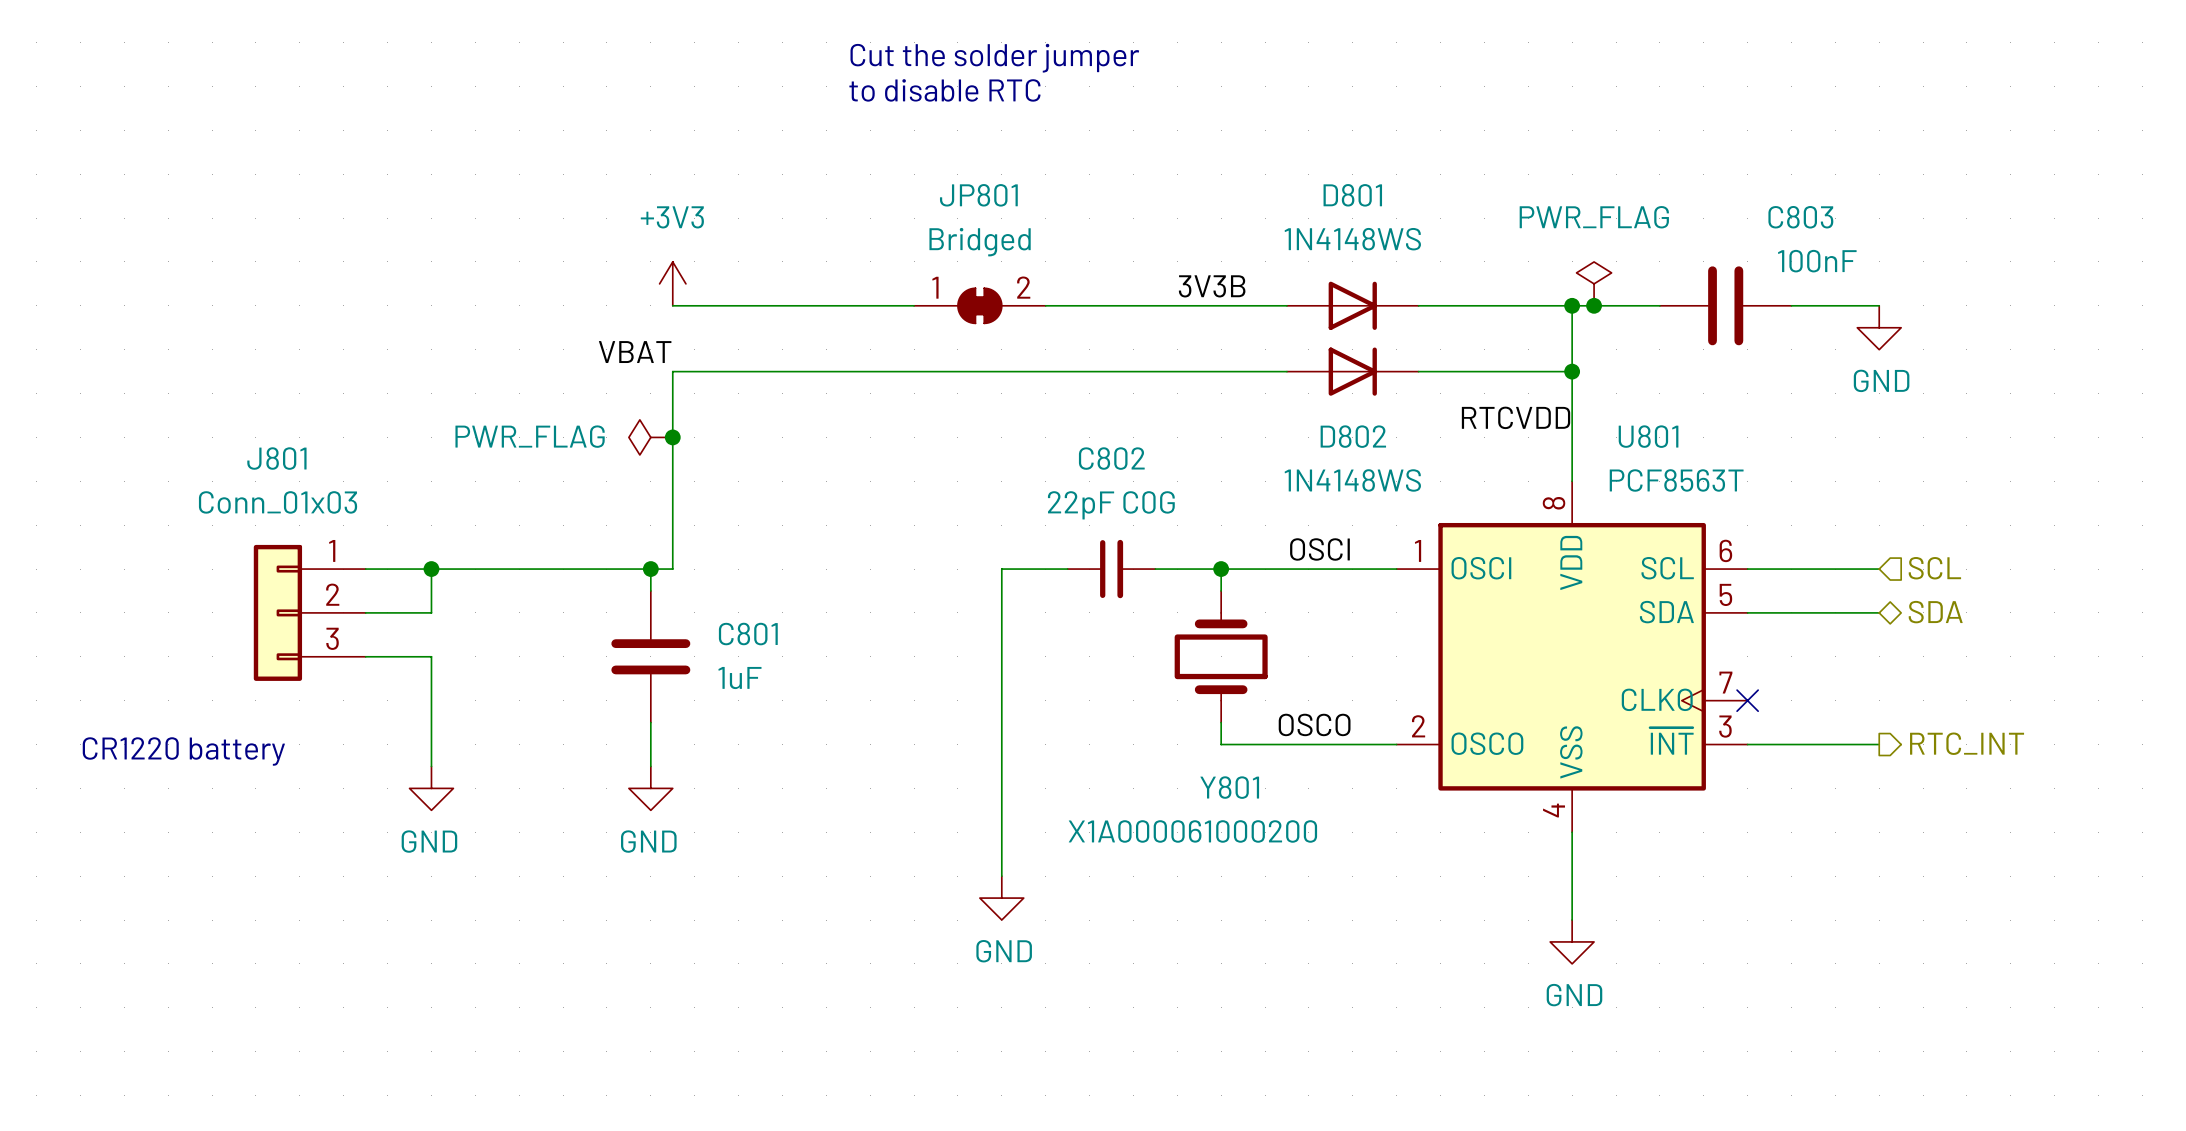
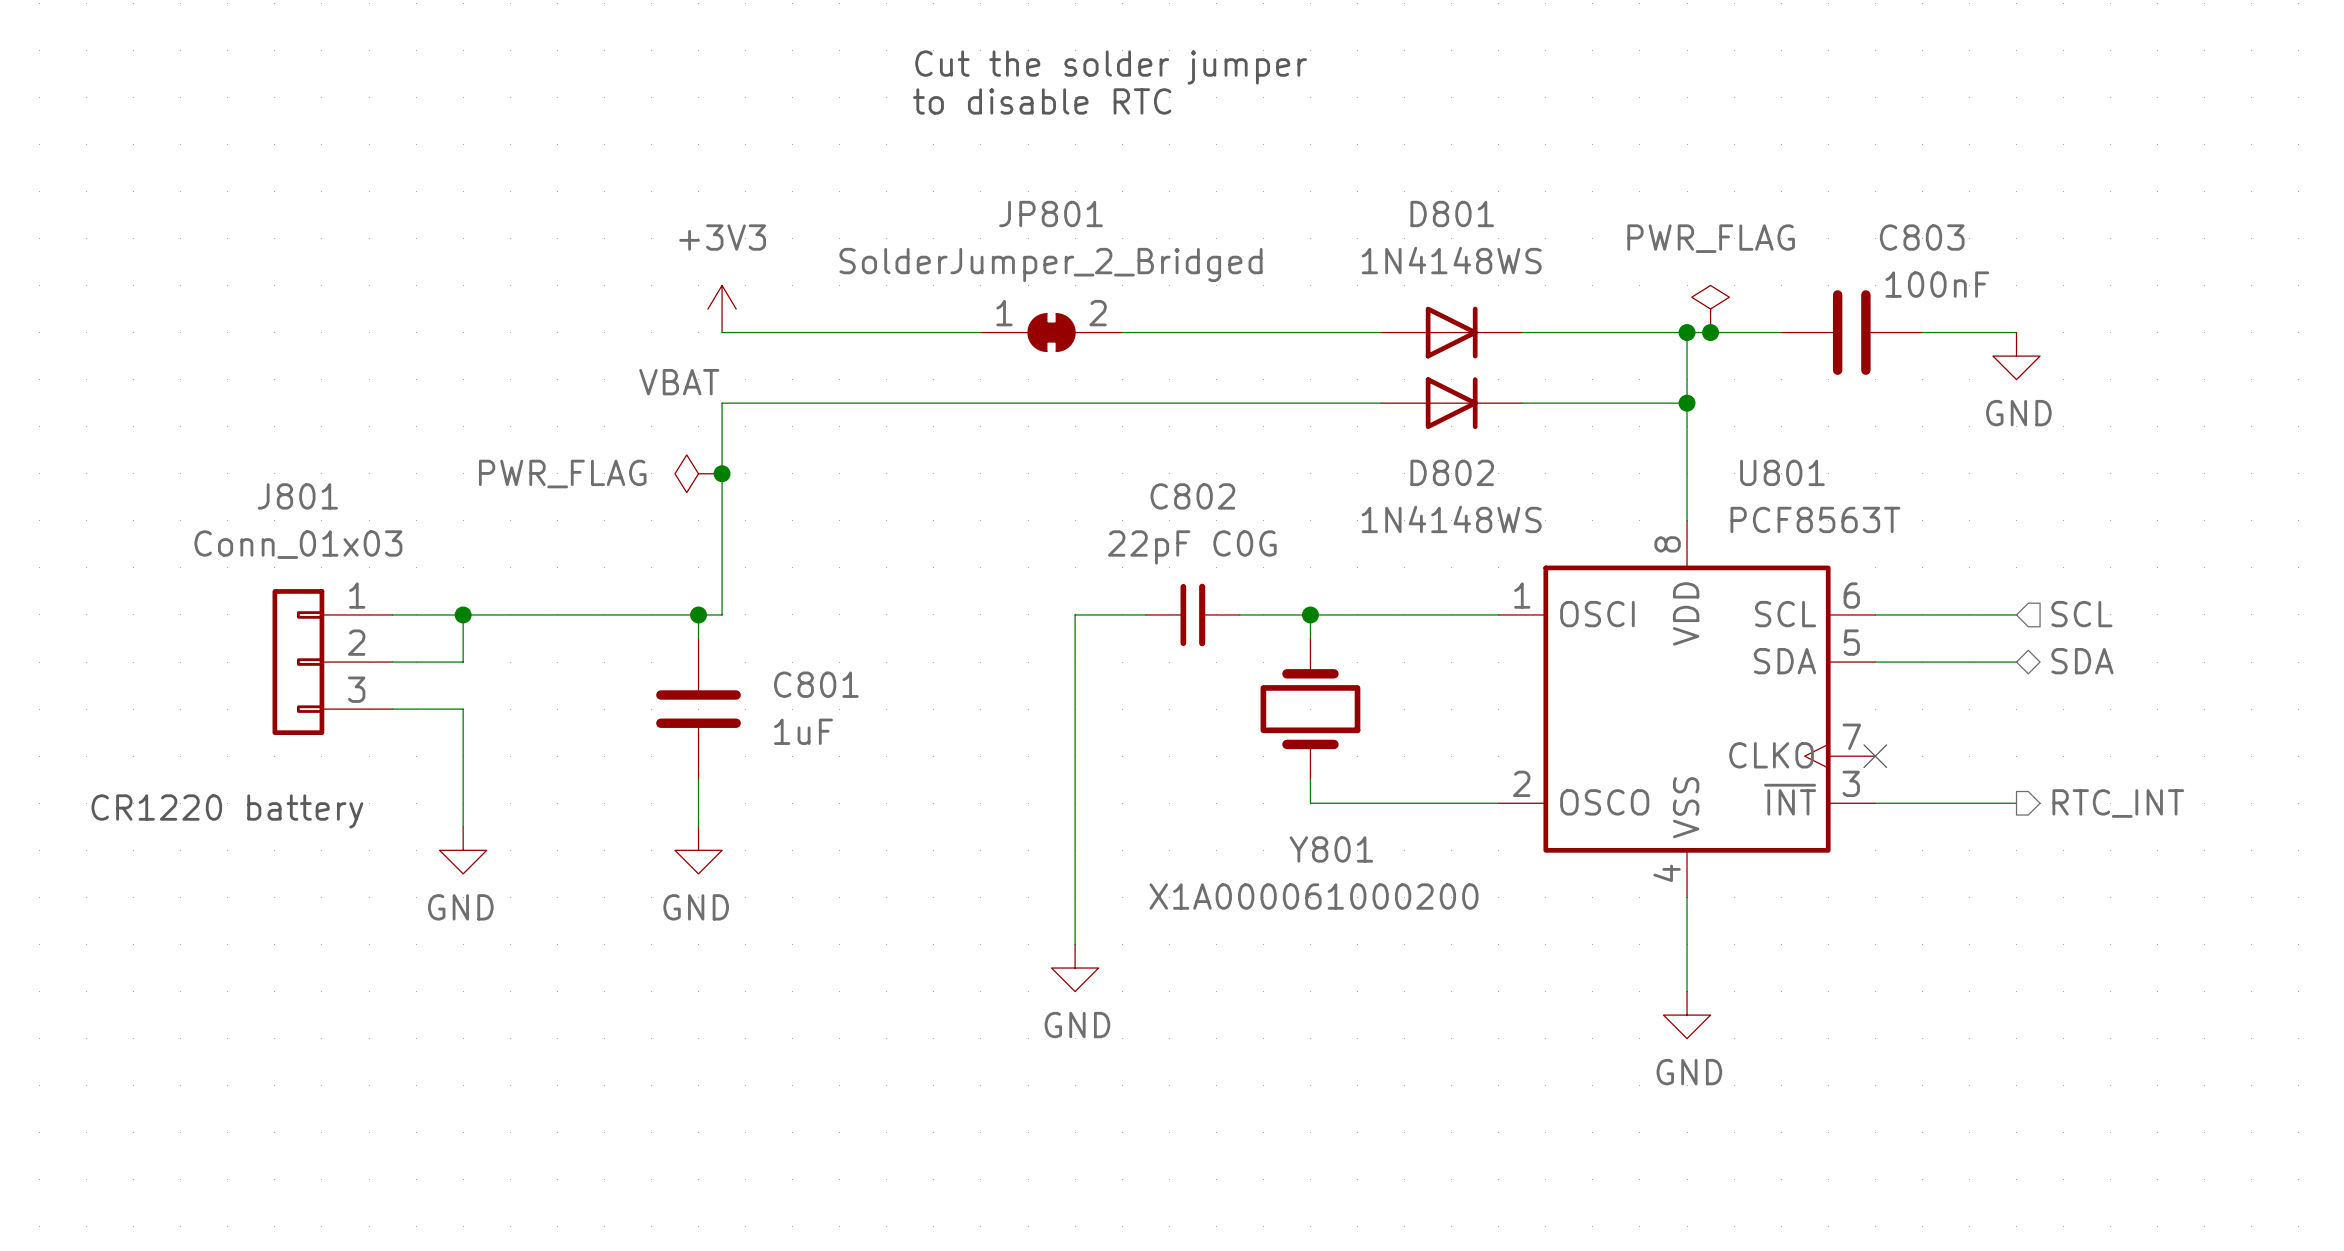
JP801 value: Bridged (980, 242) -> SolderJumper_2_Bridged (1050, 264)
label: 3V3B (1212, 286) -> none
label: RTCVDD (1516, 417) -> none
label: OSCI (1319, 549) -> none
label: OSCO (1314, 724) -> none

